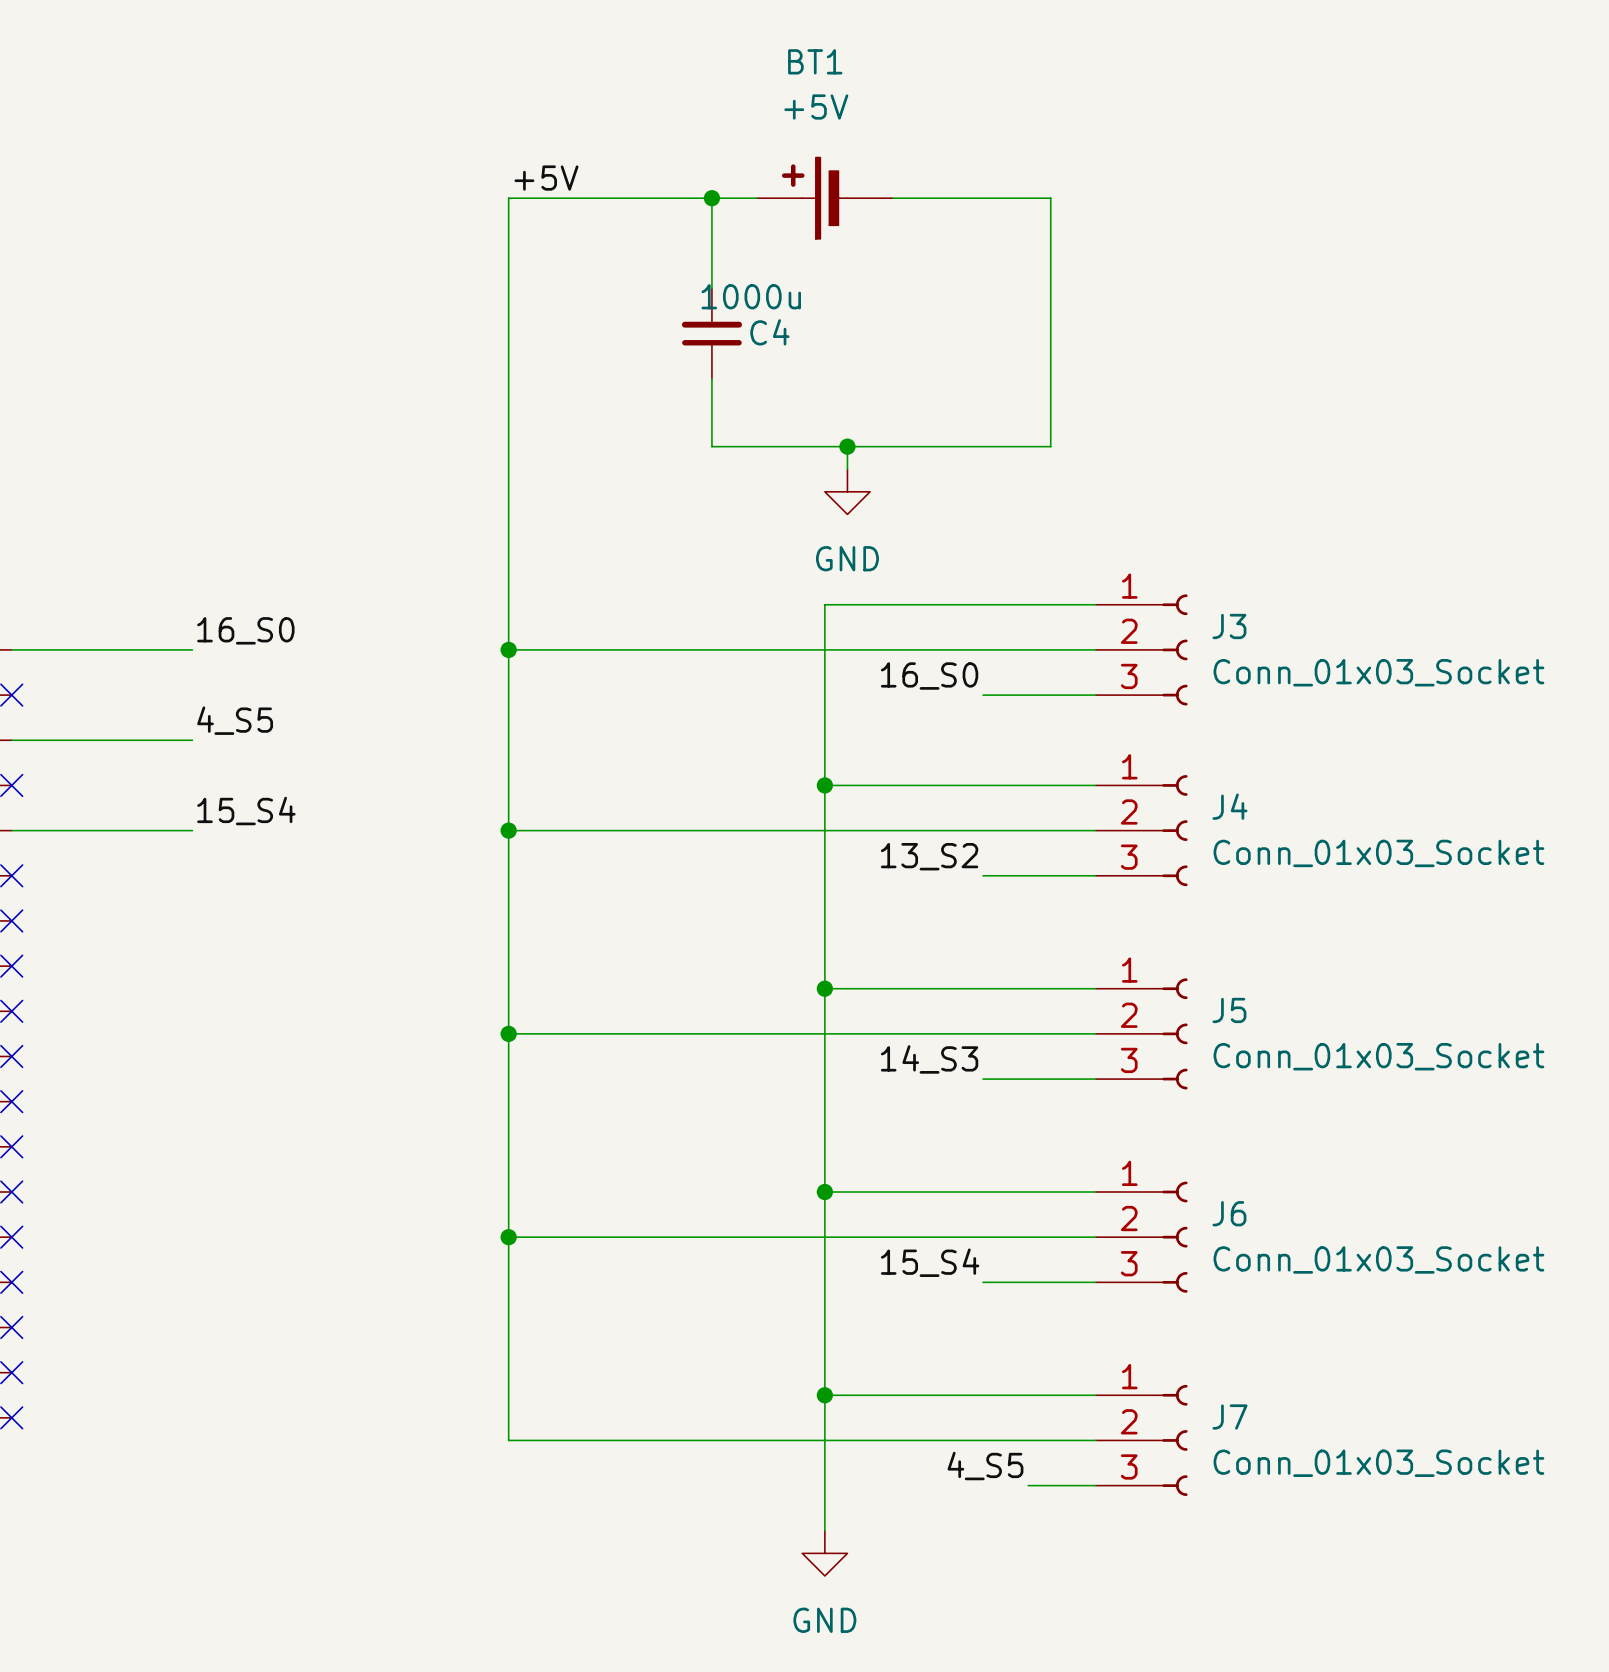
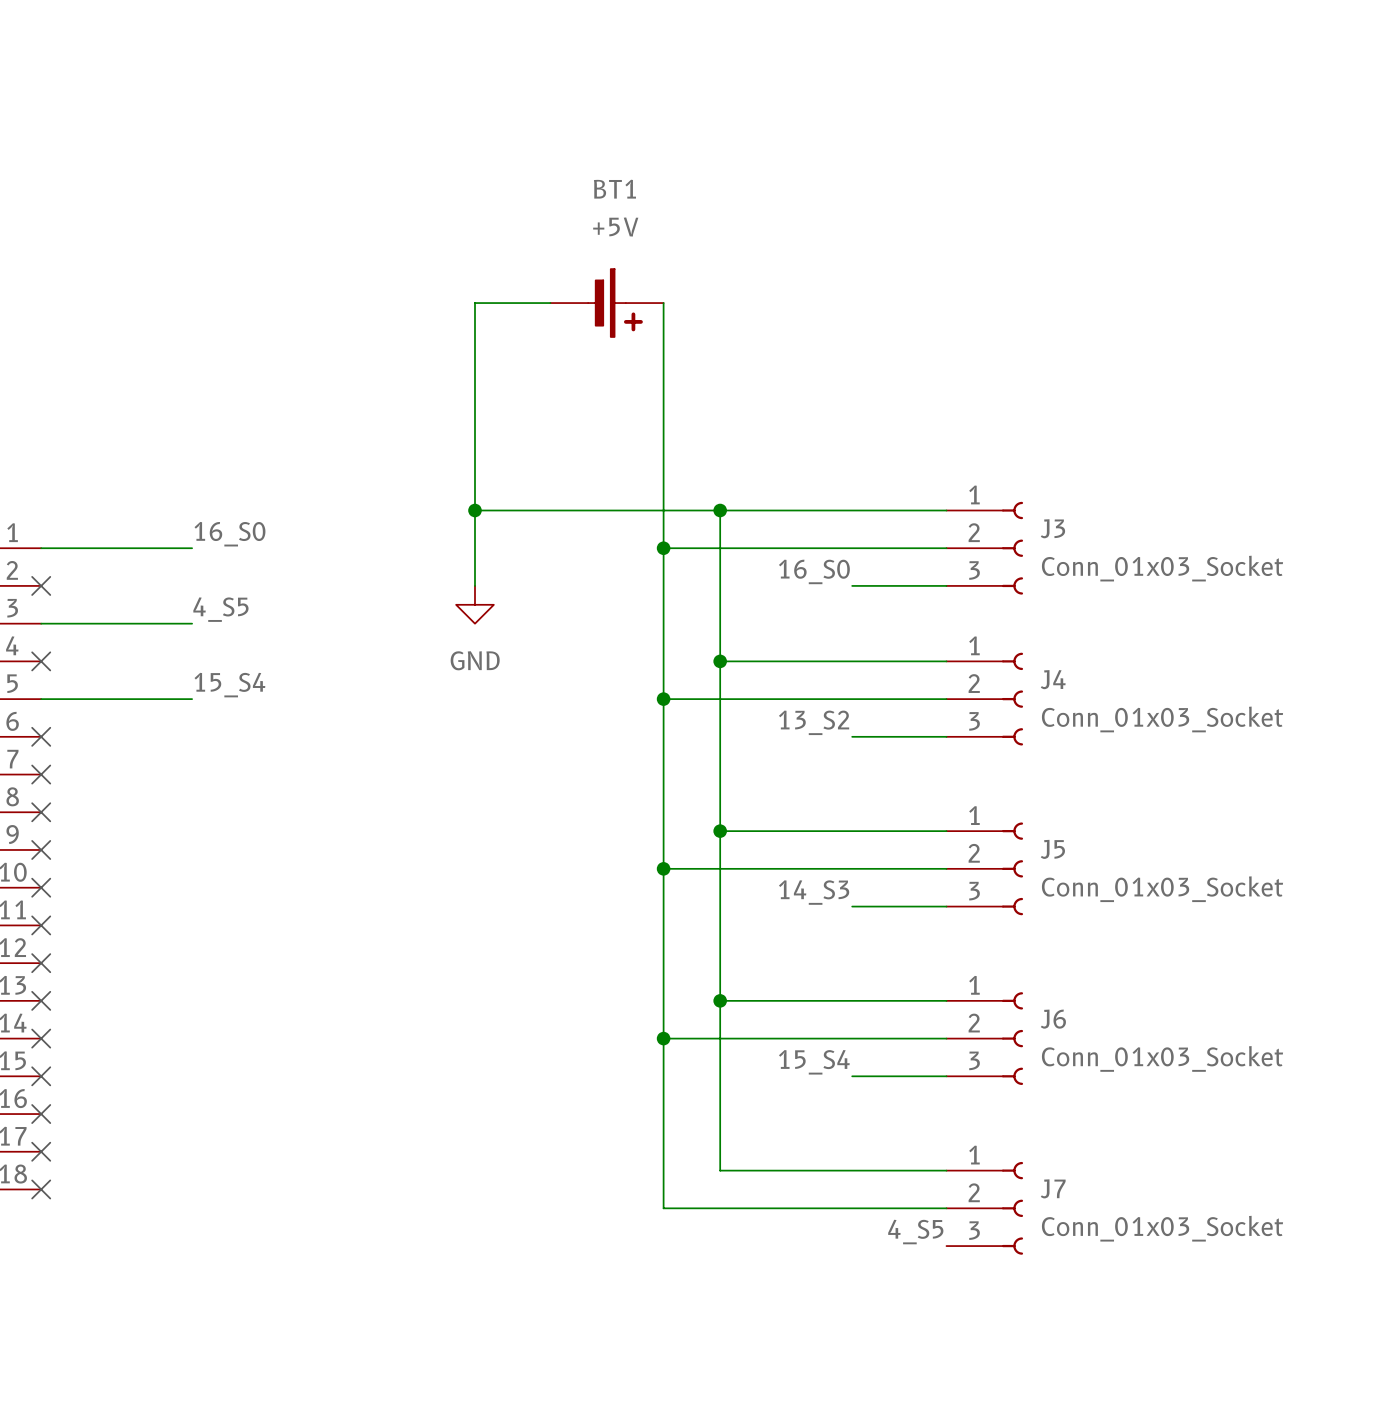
label: +5V (546, 178) -> none
wire: (711, 198) (711, 288) -> none
junction: (711, 198) -> none
wire: (757, 198) (508, 198) (508, 1440) (757, 1440) -> (663, 303) (663, 1208)
BT1 rotation: 0° (814, 198) -> 180° (615, 303)
BT1 position: (824, 198) -> (607, 303)
wire: (892, 198) (1050, 198) (1050, 446) (711, 446) (711, 378) -> none
C4: 1000u (711, 333) -> none
wire: none -> (550, 303) (474, 303) (474, 585)
wire: (847, 446) (847, 469) -> none
junction: (847, 446) -> none
power symbol position: GND (847, 491) -> GND (474, 604)
wire: none -> (474, 510) (720, 510)
junction: none -> (720, 510)
wire: (508, 649) (757, 649) -> none
junction position: (508, 649) -> (474, 510)
junction: none -> (663, 548)
wire: (508, 830) (757, 830) -> none
junction: (508, 830) -> none
junction: none -> (663, 699)
wire: (508, 1033) (757, 1033) -> none
junction: (508, 1033) -> none
junction: none -> (663, 868)
wire: (508, 1237) (757, 1237) -> none
junction: (508, 1237) -> none
junction: none -> (663, 1038)
wire: (824, 1395) (824, 1530) -> none
junction: (824, 1395) -> none
label position: 4_S5 (985, 1466) -> 4_S5 (915, 1232)
wire: (1028, 1485) (1095, 1485) -> none
power symbol: GND (824, 1553) -> none

